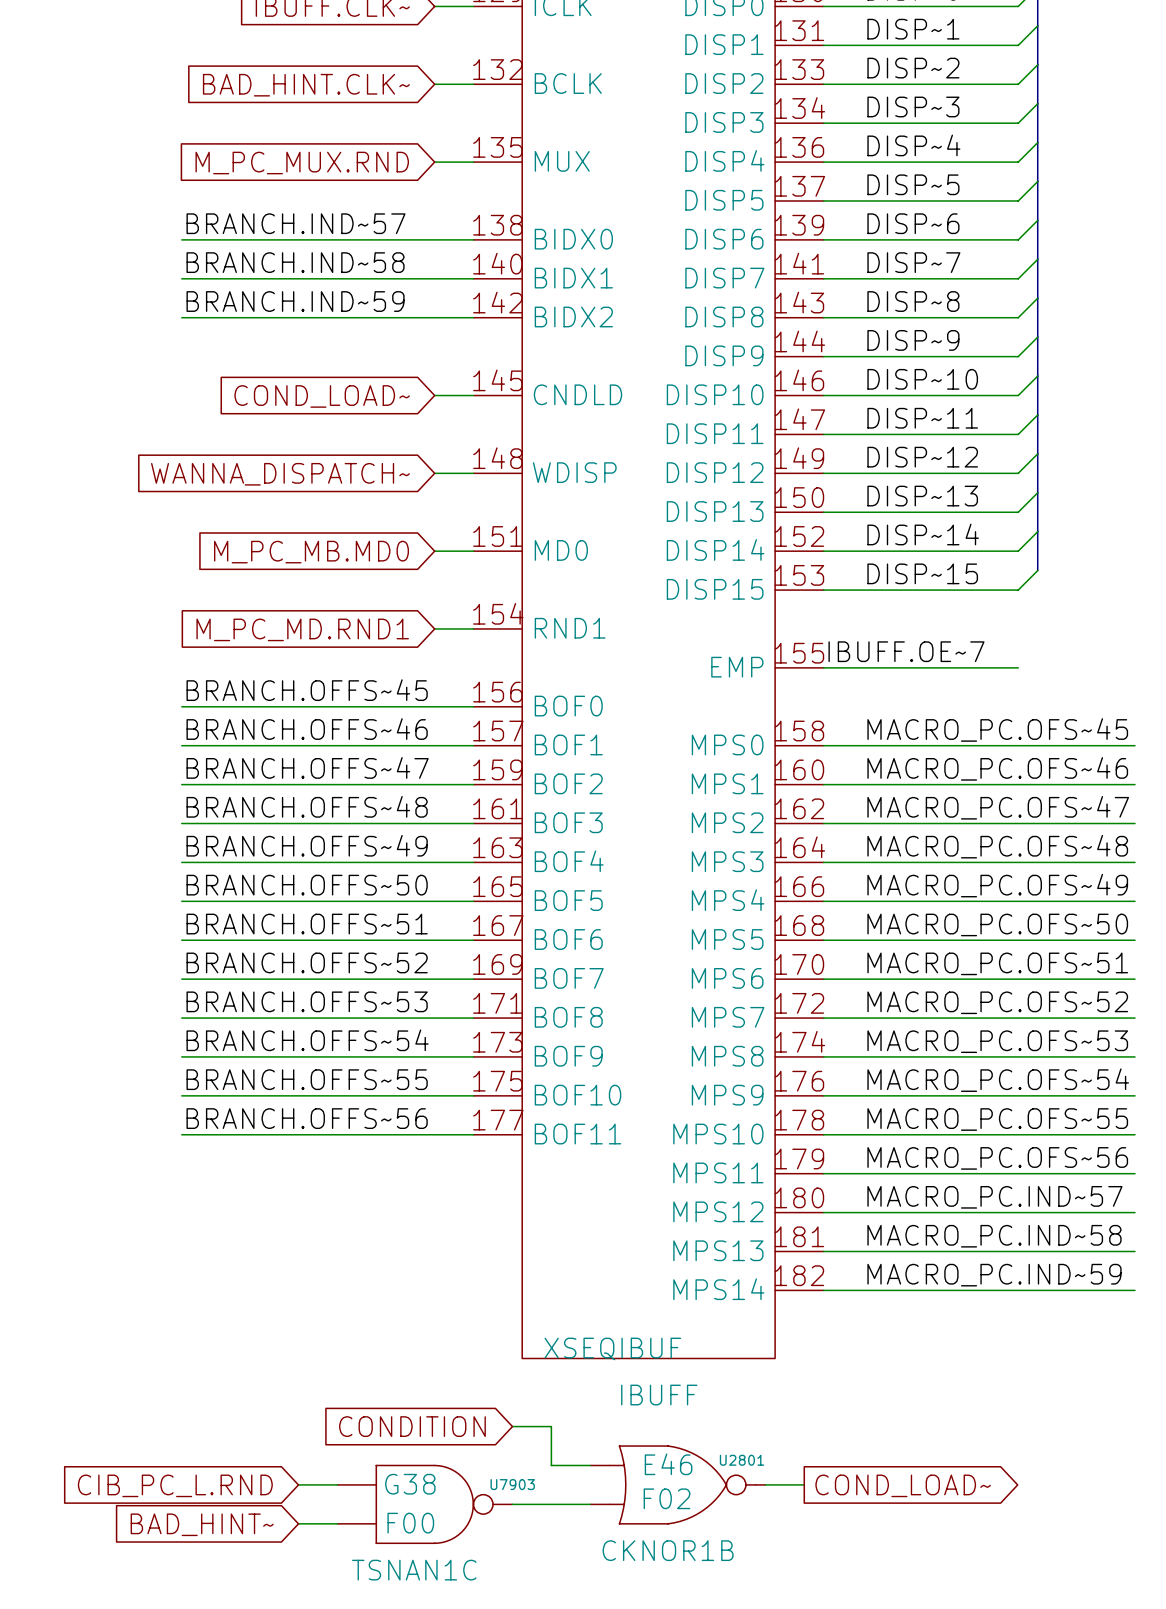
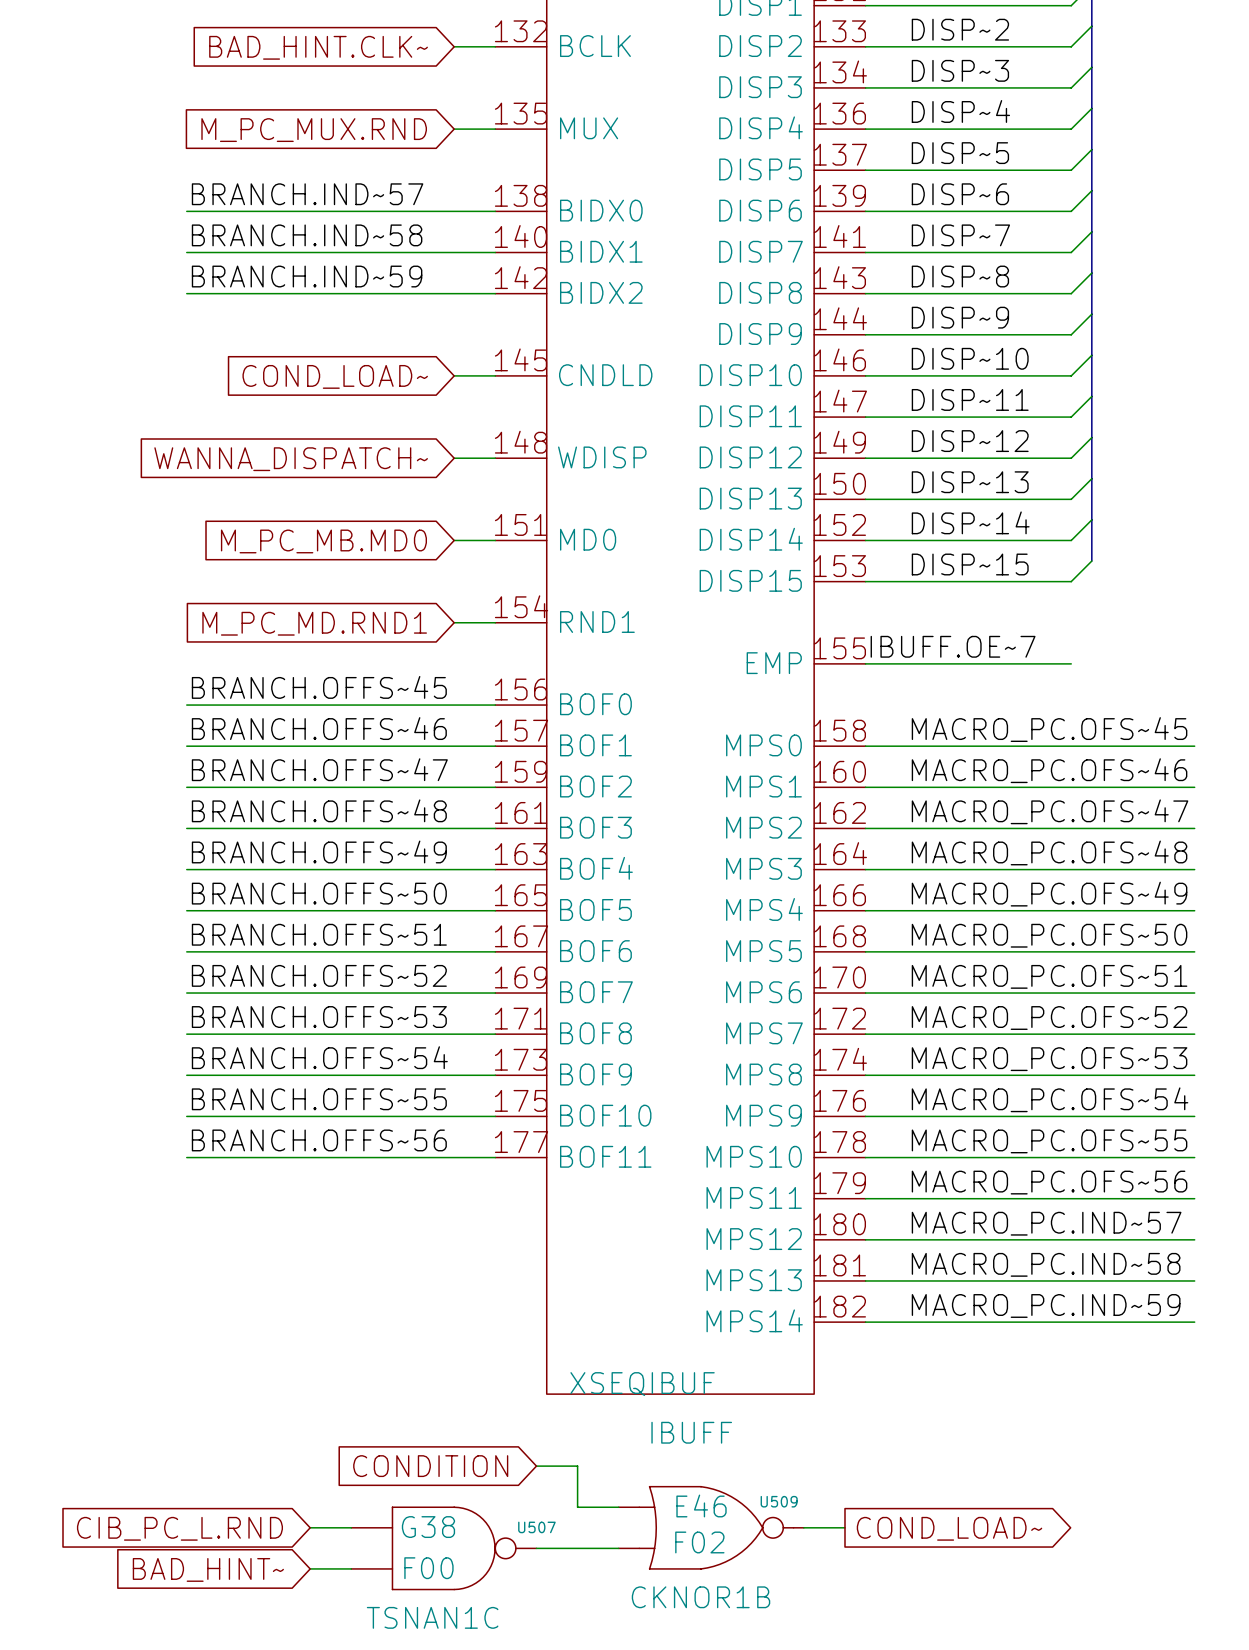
U2801 name: U2801 (742, 1460) -> U509 (779, 1501)
U7903 name: U7903 (512, 1484) -> U507 (536, 1527)

